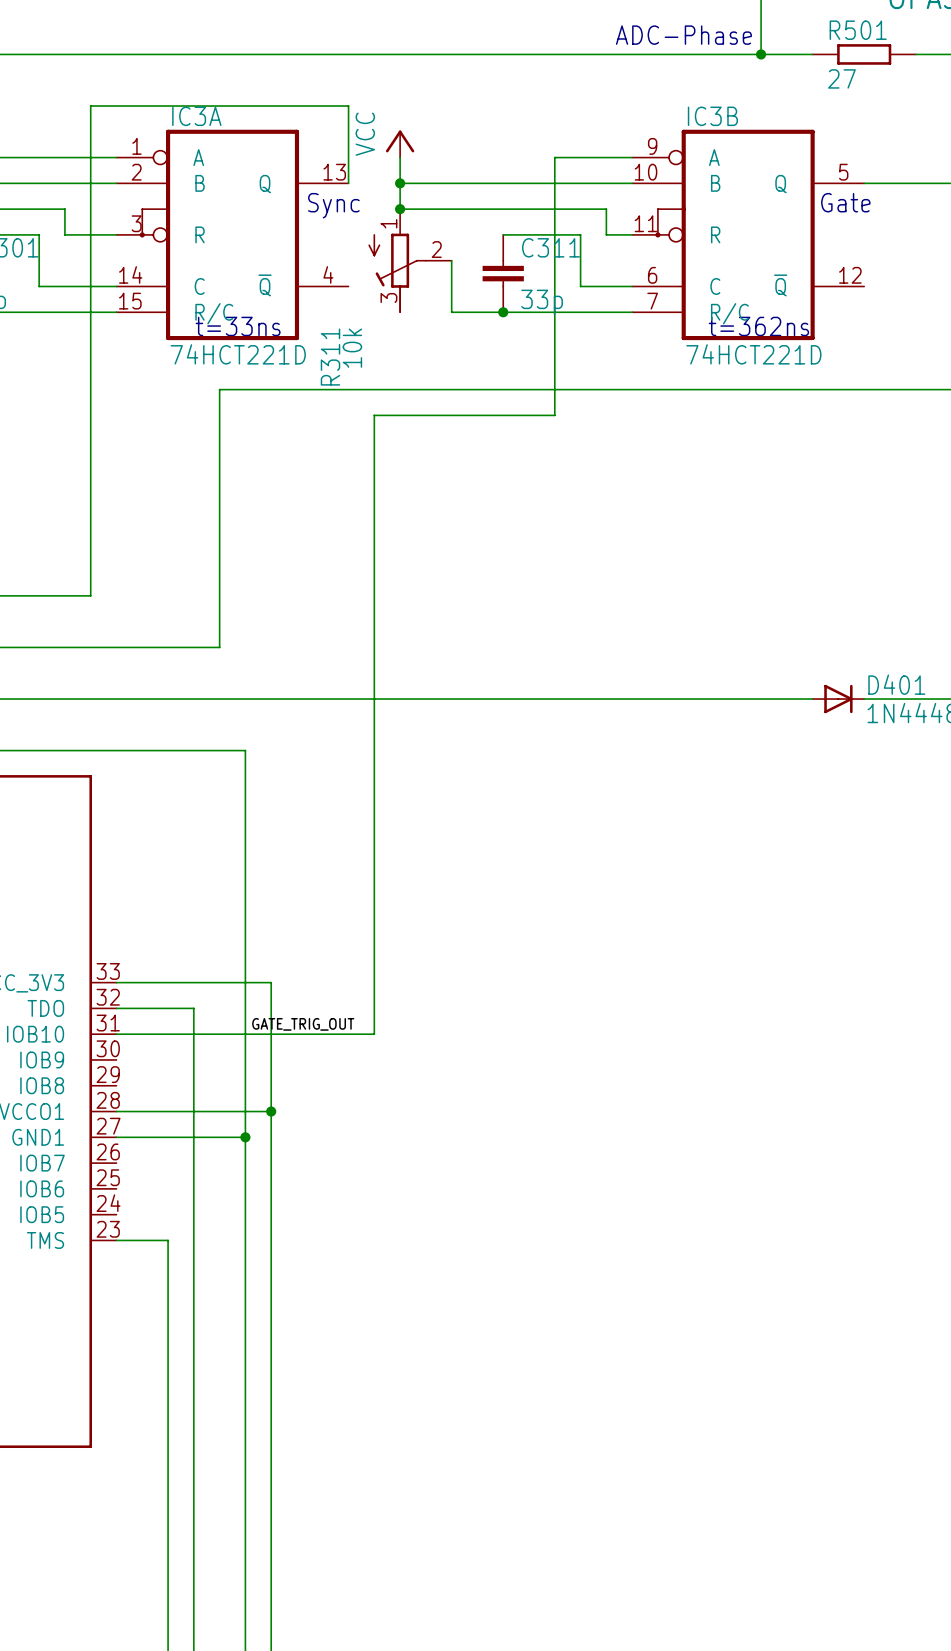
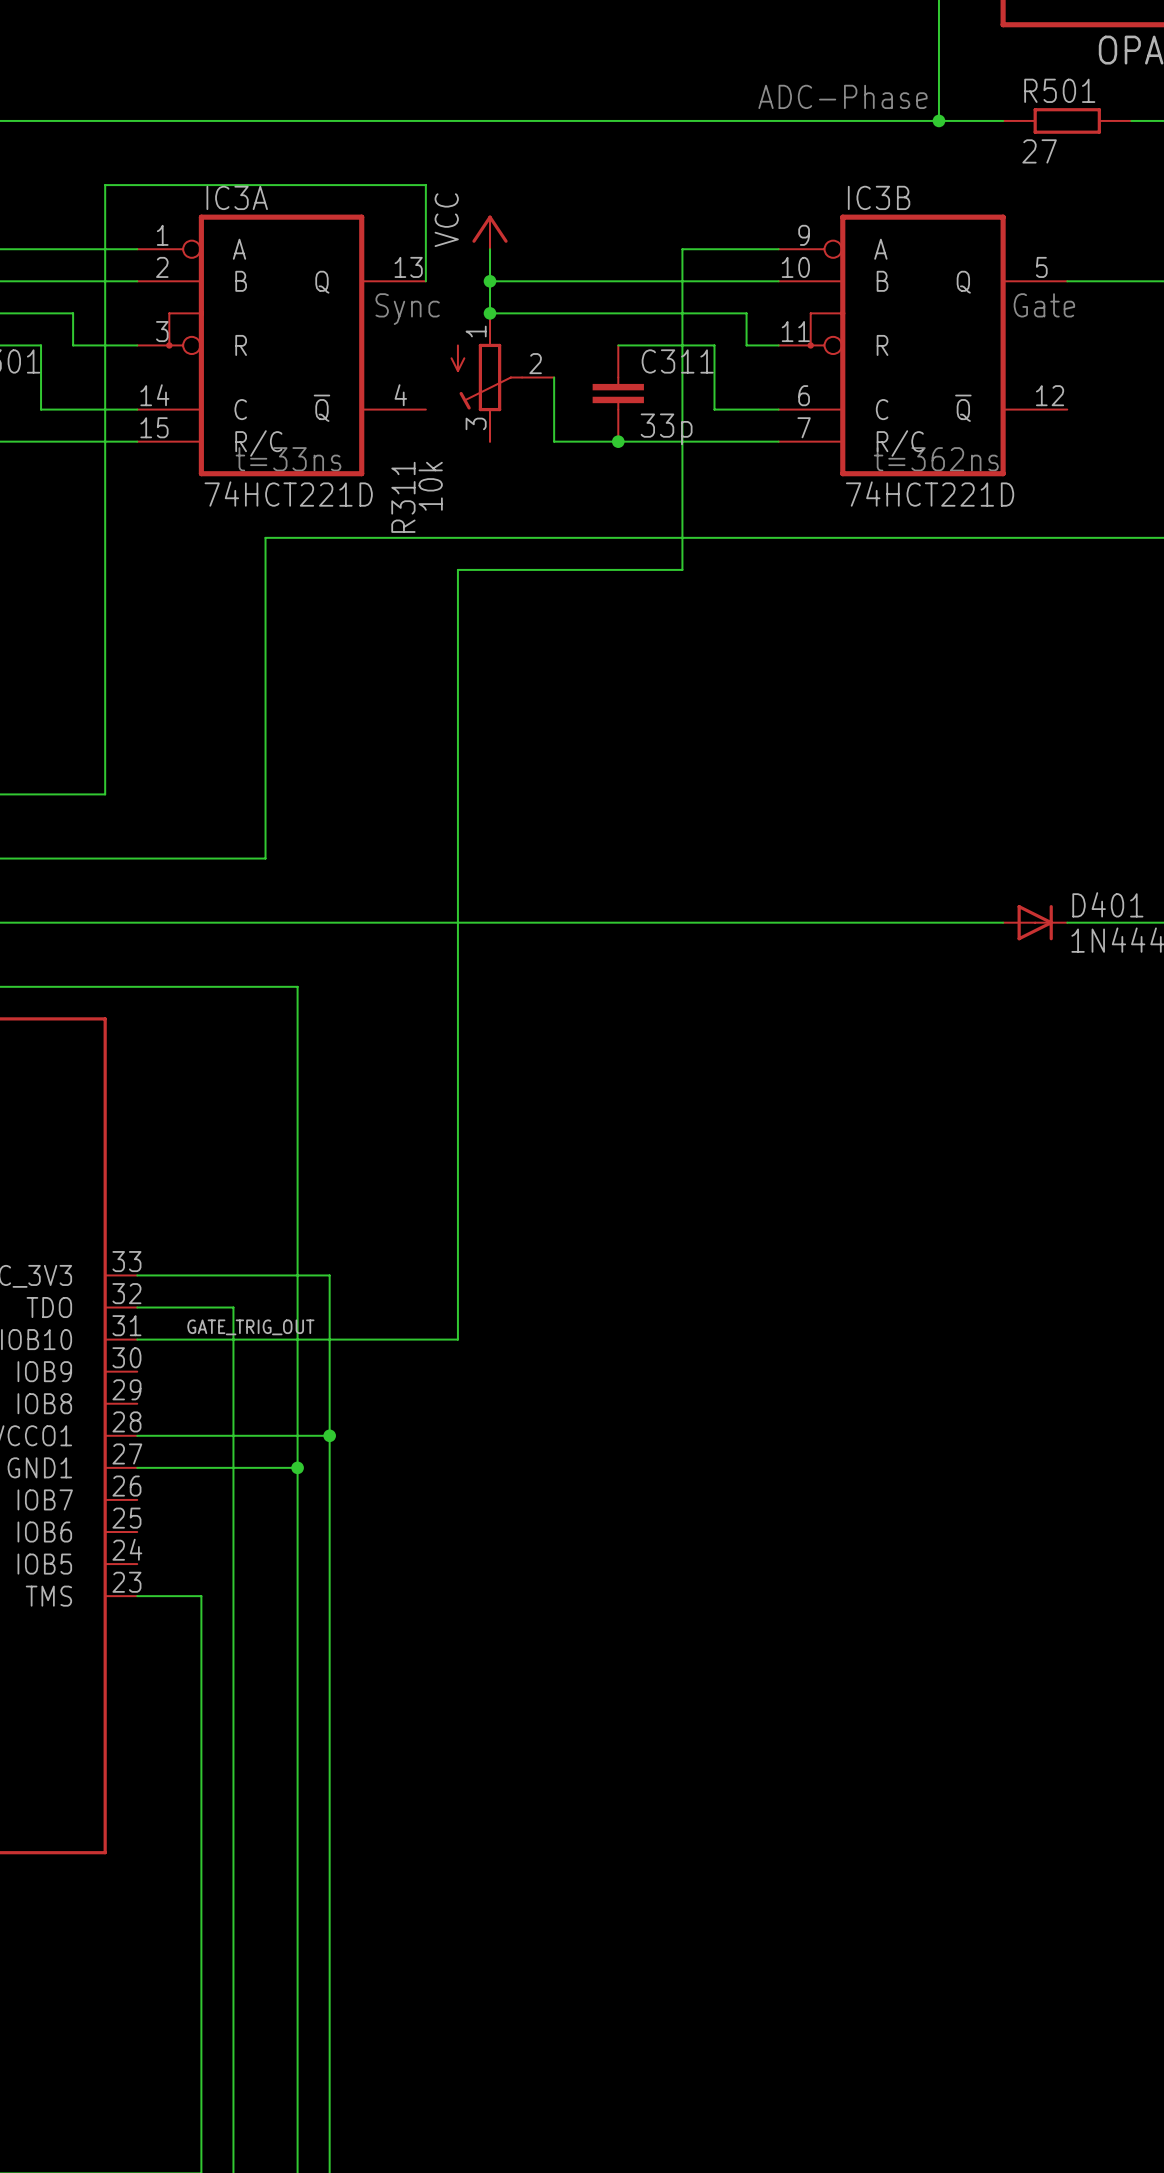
label position: GATE_TRIG_OUT (303, 1024) -> GATE_TRIG_OUT (250, 1327)

